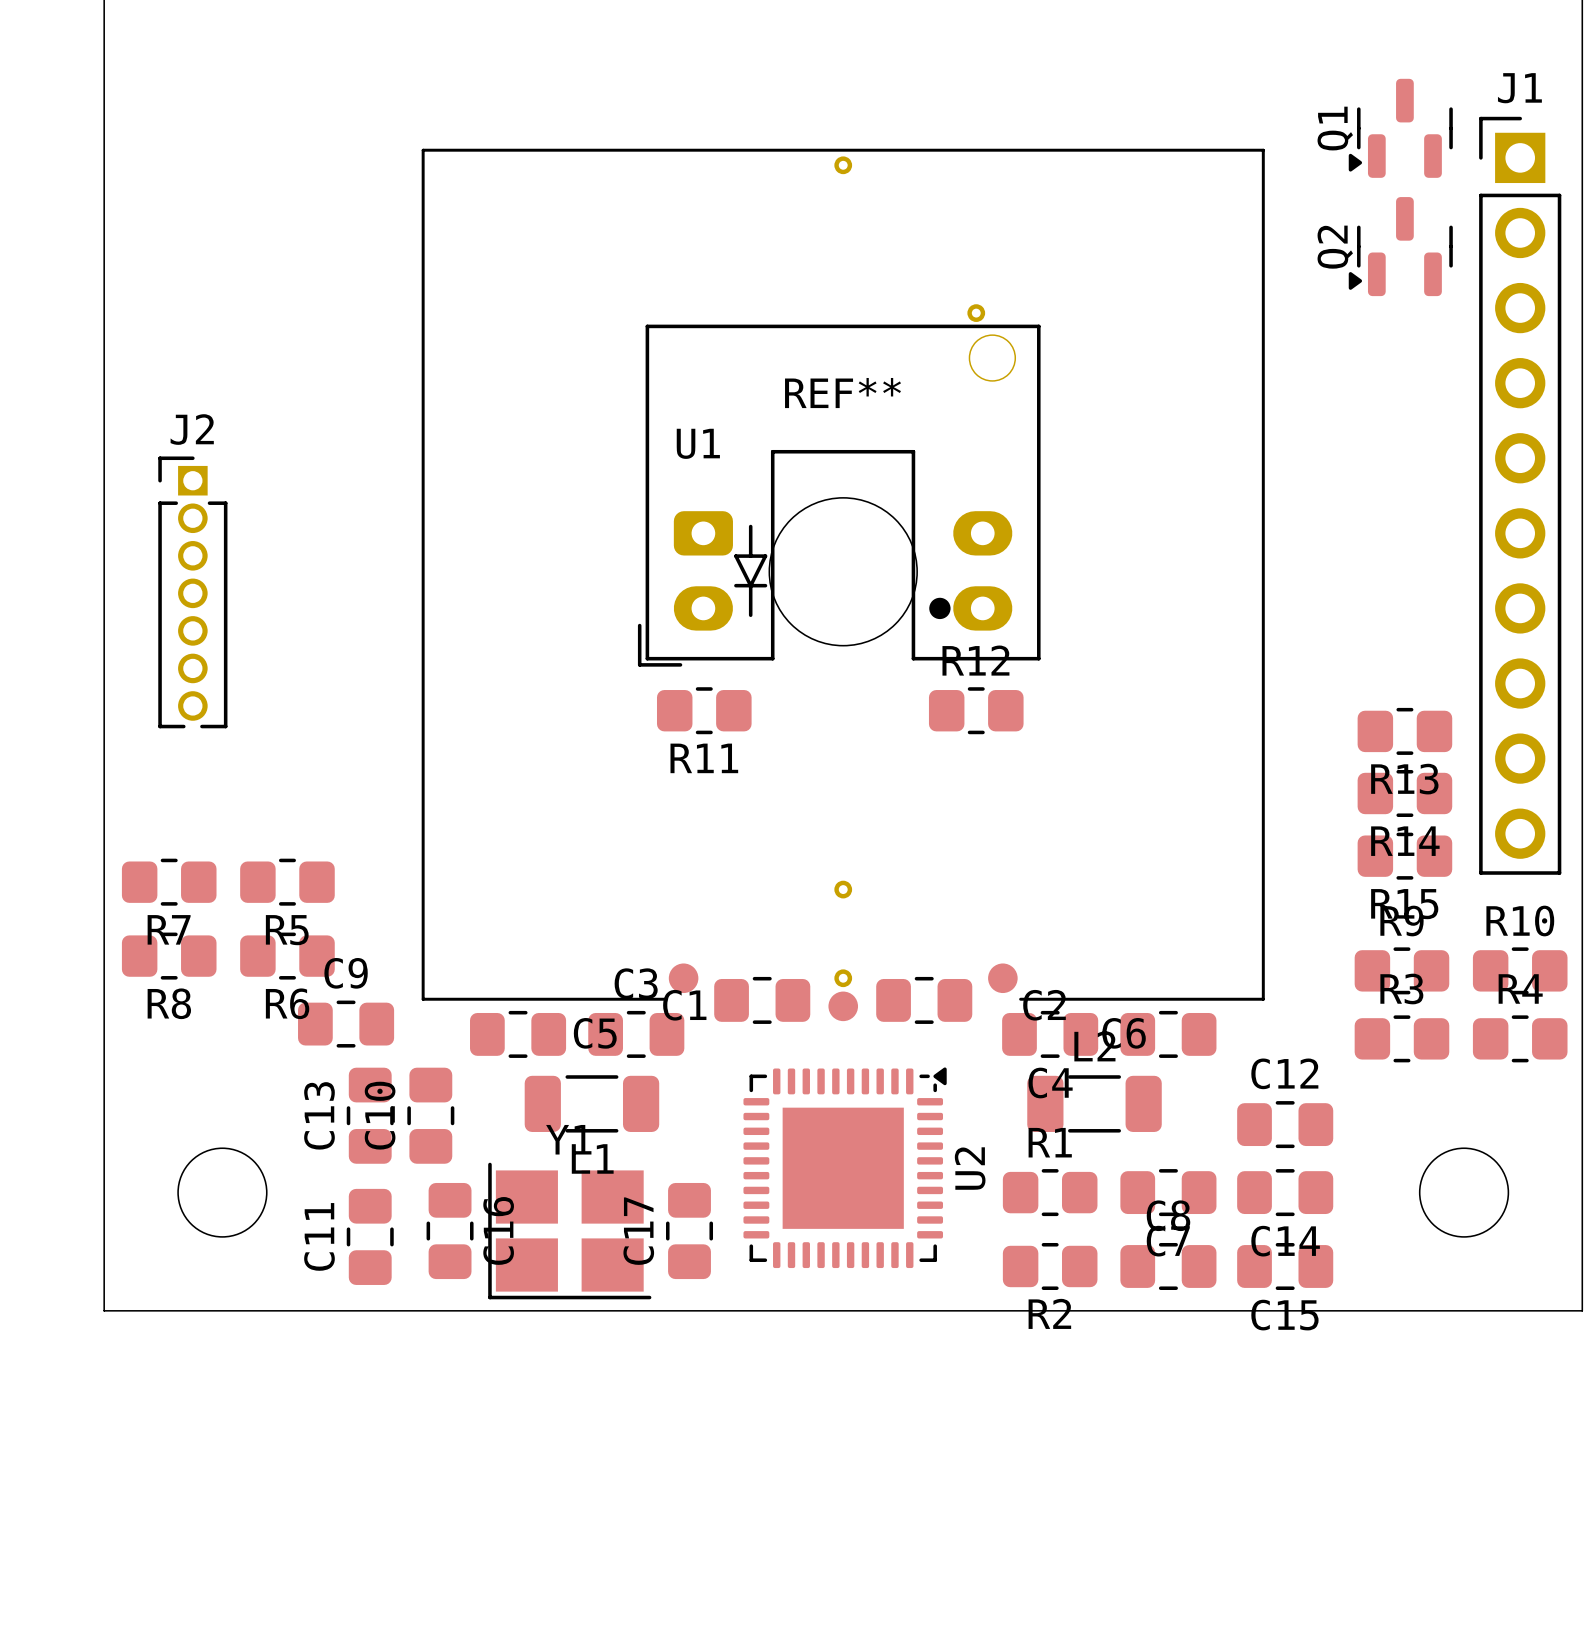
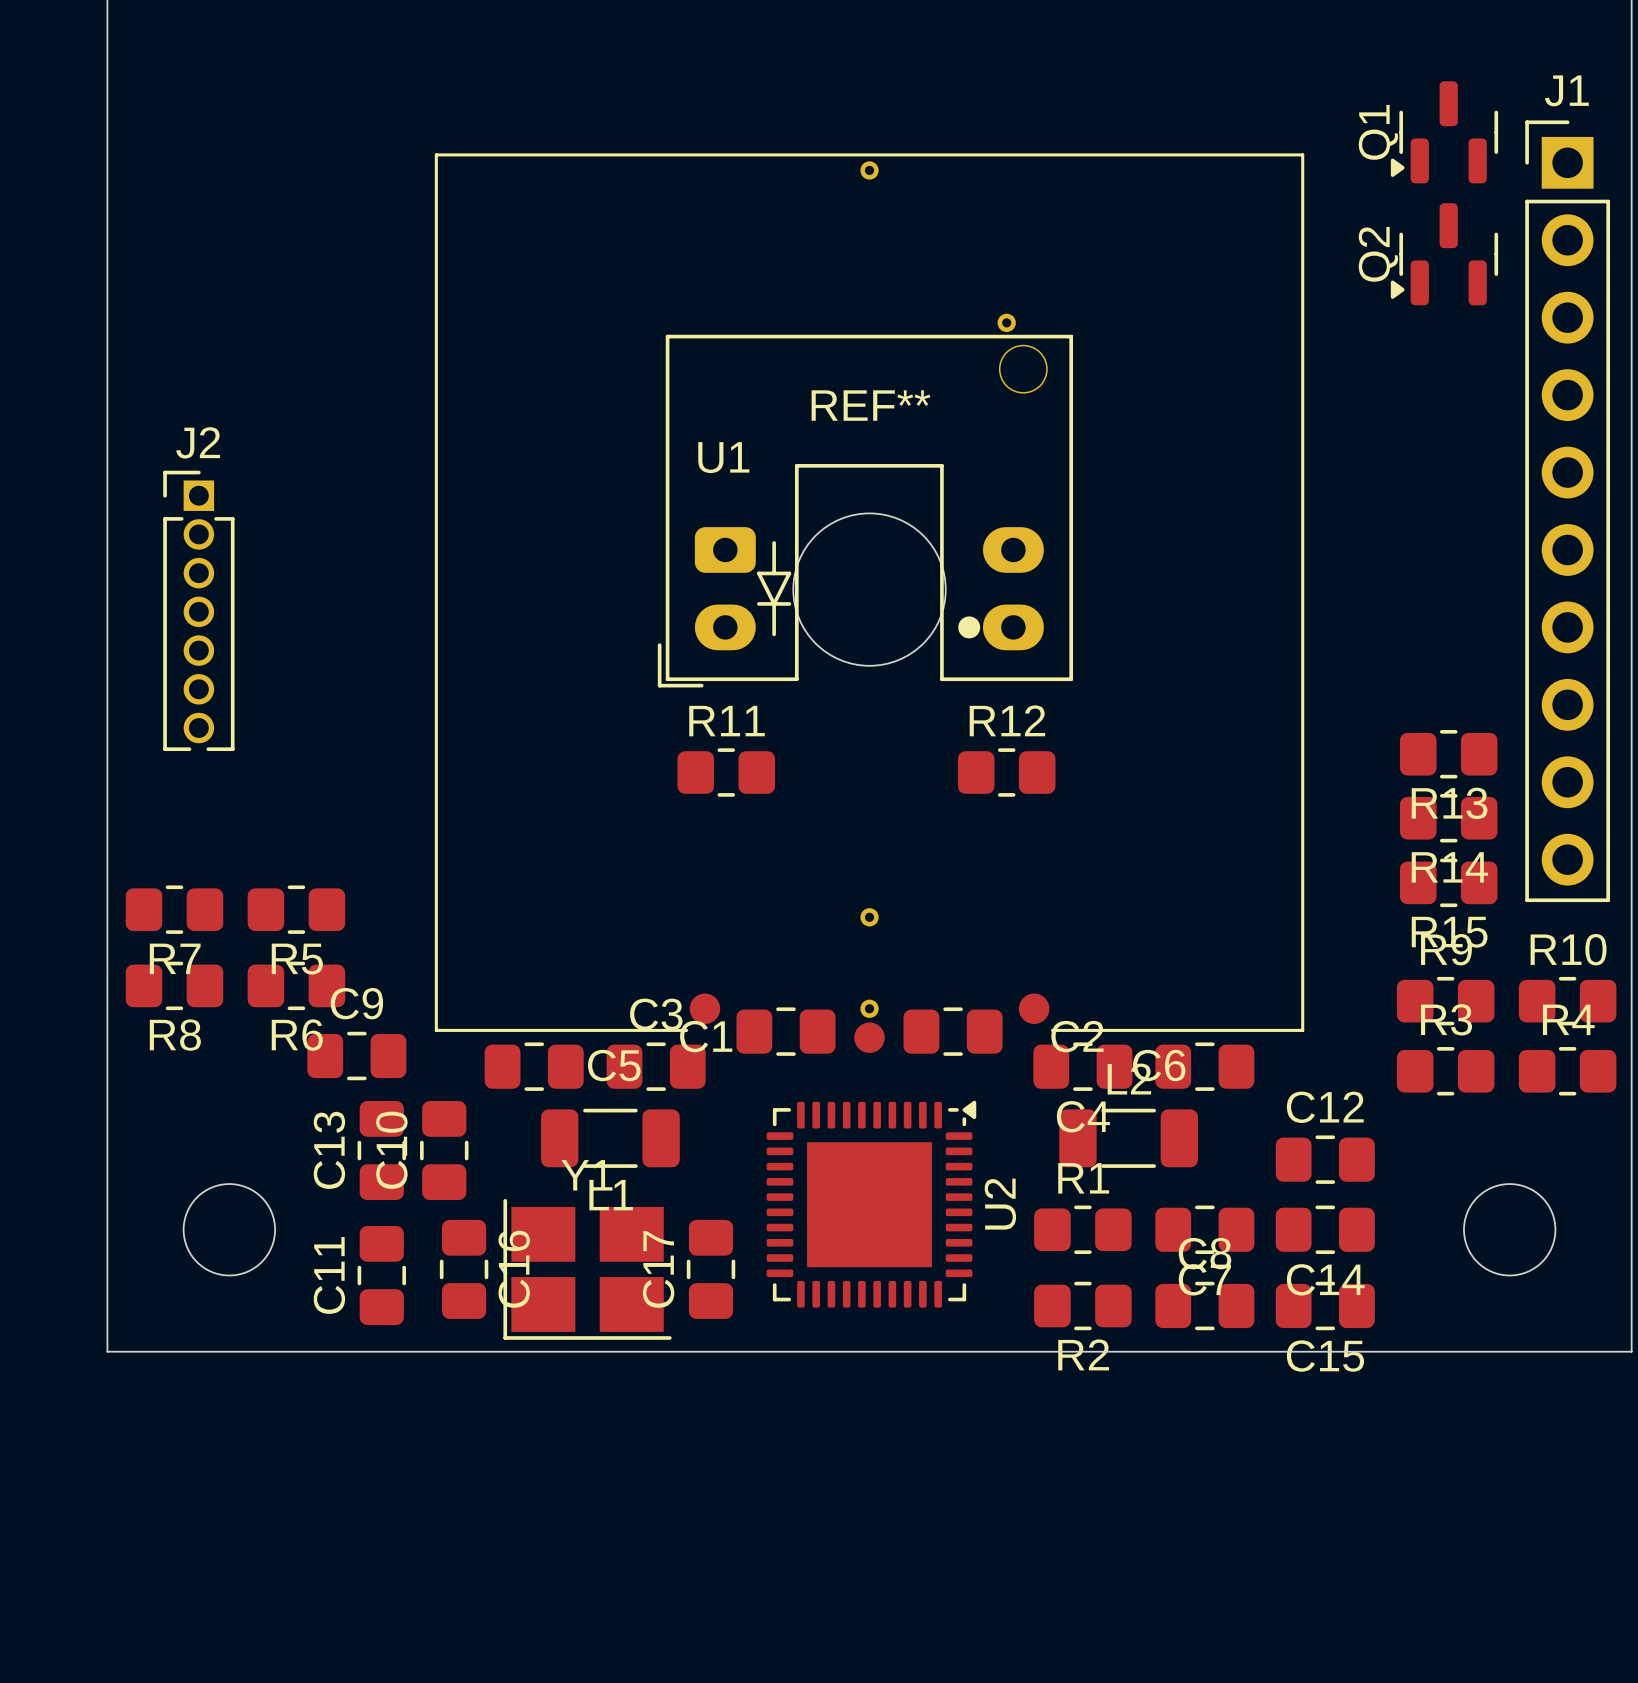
R11 position: (704, 710) -> (726, 772)
R12 position: (976, 710) -> (1006, 772)
R11 name position: R11 (704, 758) -> R11 (726, 721)

